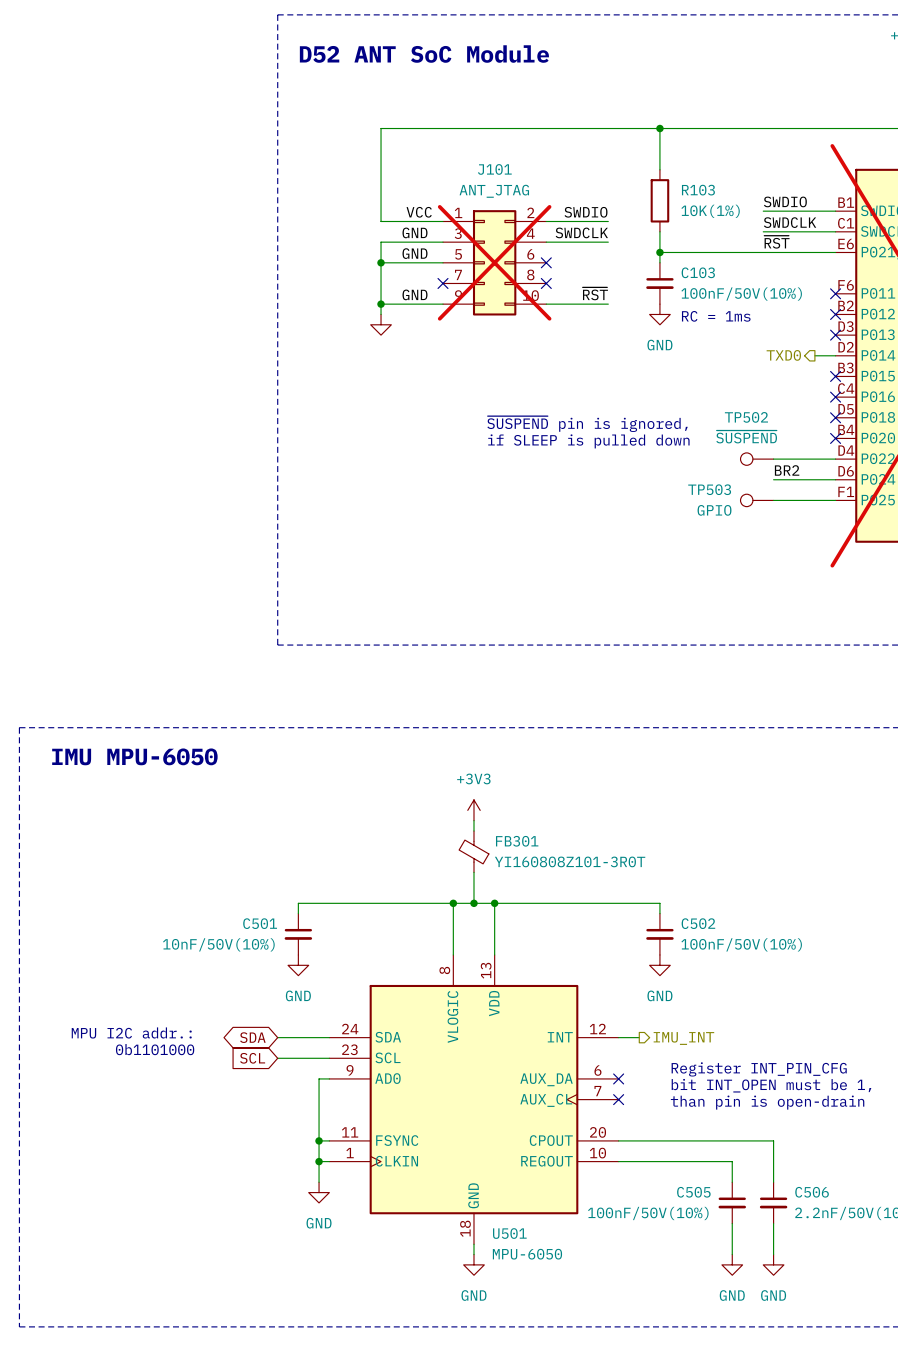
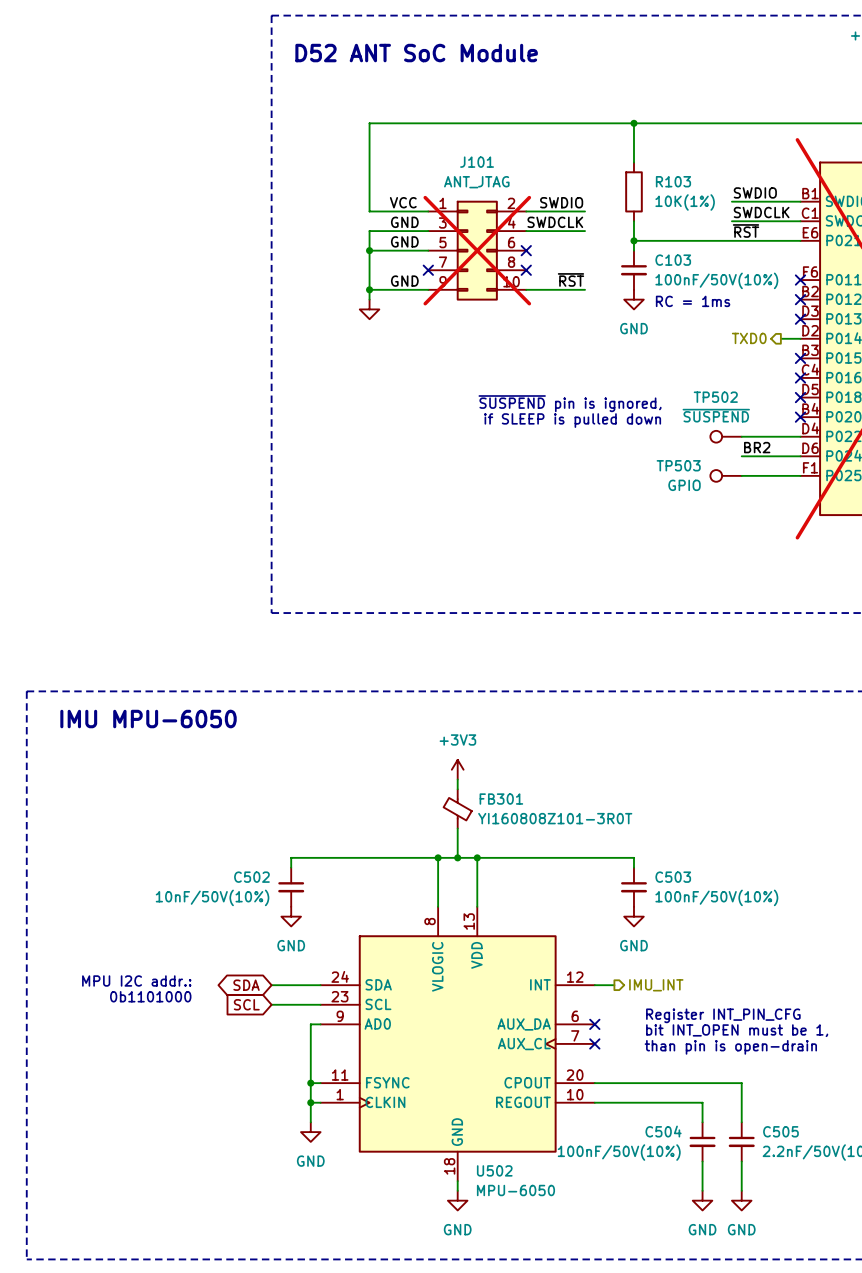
C501 name: C501 (260, 923) -> C502 (251, 877)
C502 name: C502 (698, 923) -> C503 (673, 877)
C505 name: C505 (693, 1192) -> C504 (663, 1131)
C506 name: C506 (812, 1192) -> C505 (780, 1131)
U501 name: U501 (509, 1233) -> U502 (494, 1170)

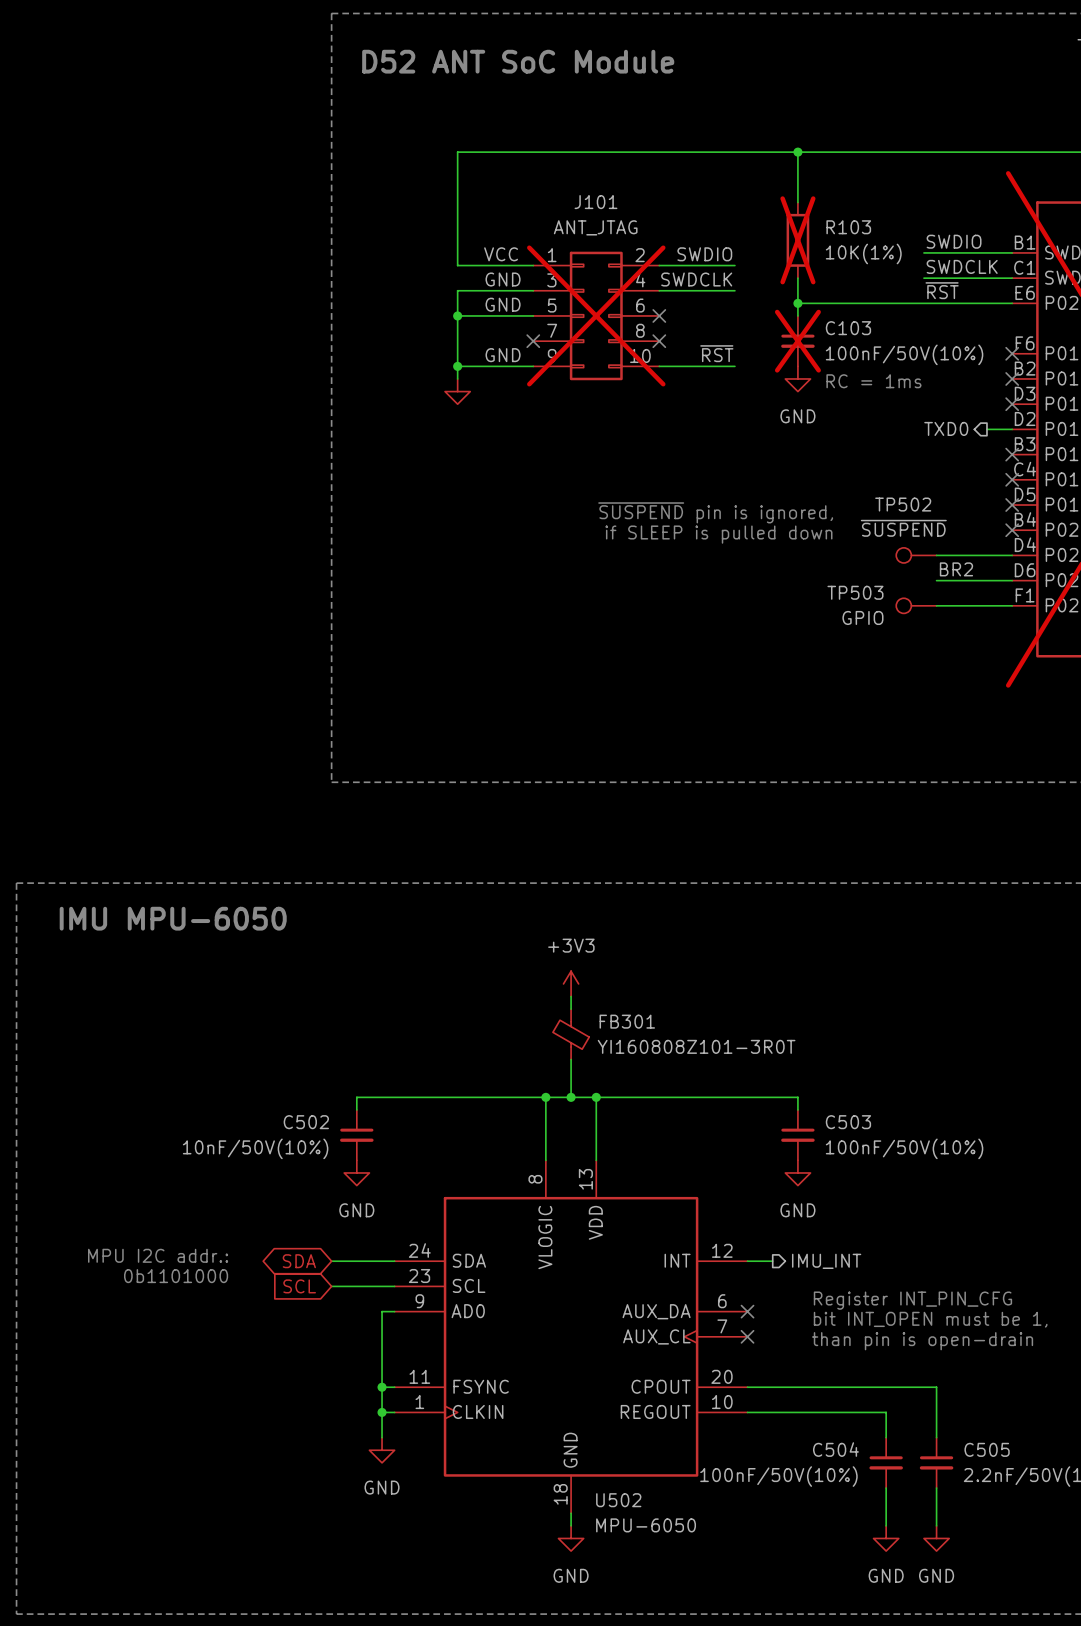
R103 do-not-place cross: none -> (797, 240)
C103 do-not-place cross: none -> (797, 341)

